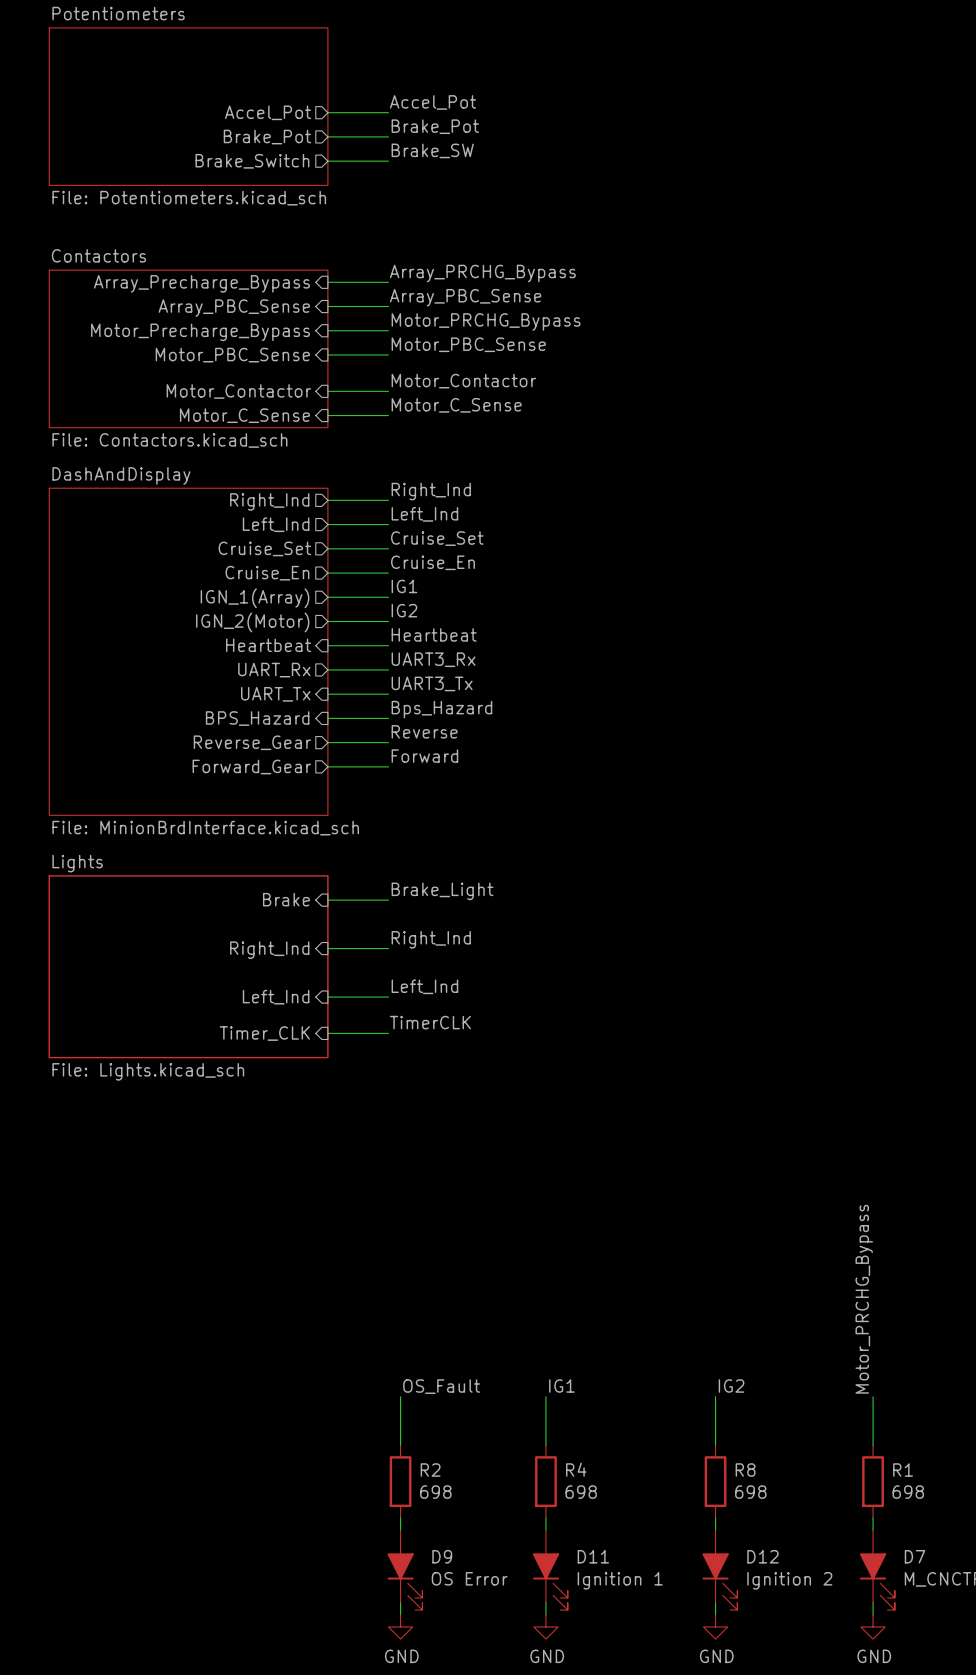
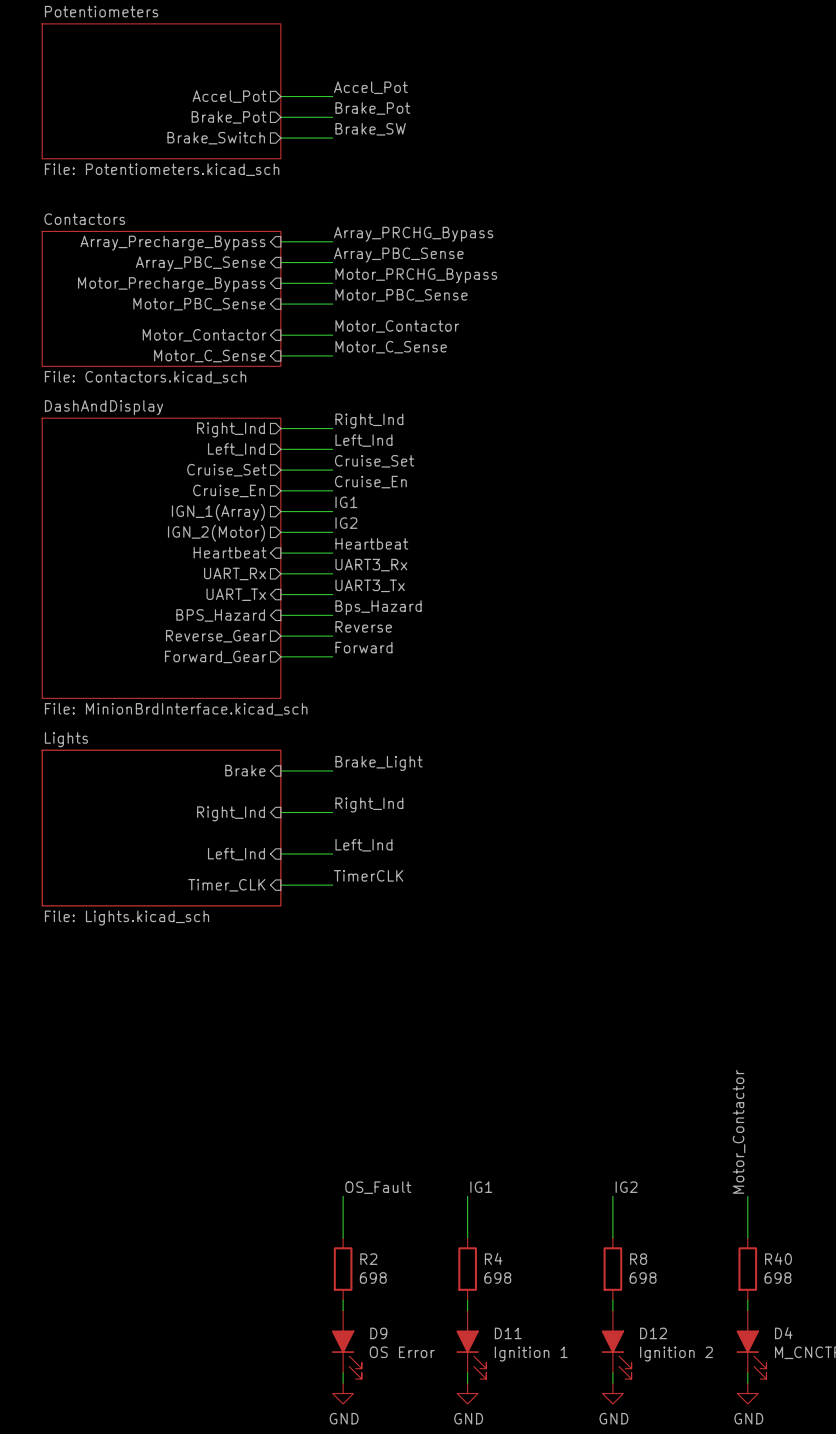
label: Motor_PRCHG_Bypass (864, 1299) -> Motor_Contactor (739, 1131)
R1 name: R1 (903, 1470) -> R40 (778, 1258)
D7 name: D7 (914, 1556) -> D4 (783, 1333)

